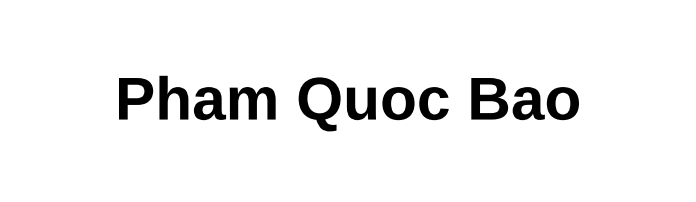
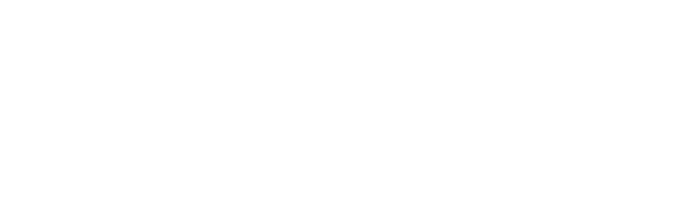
text: Pham Quoc Bao (348, 103) -> none

